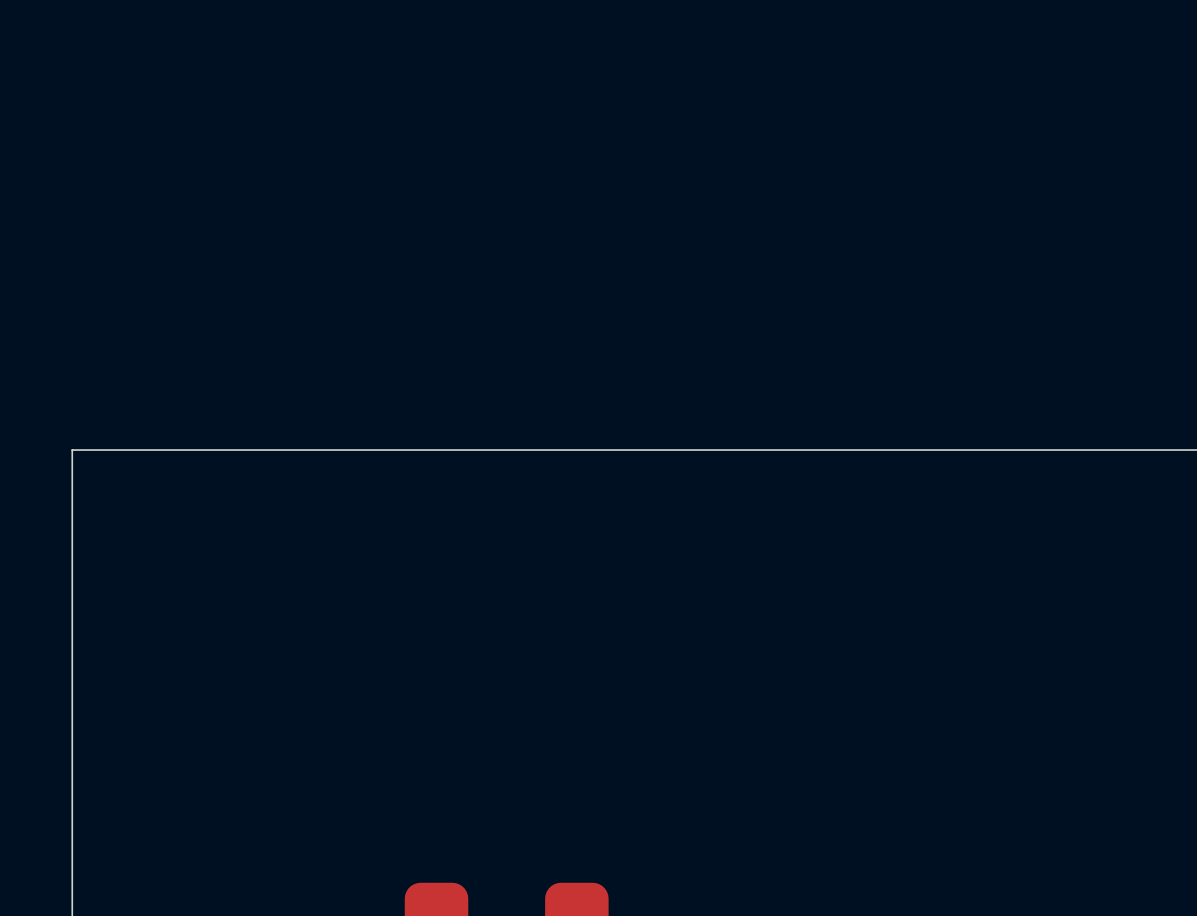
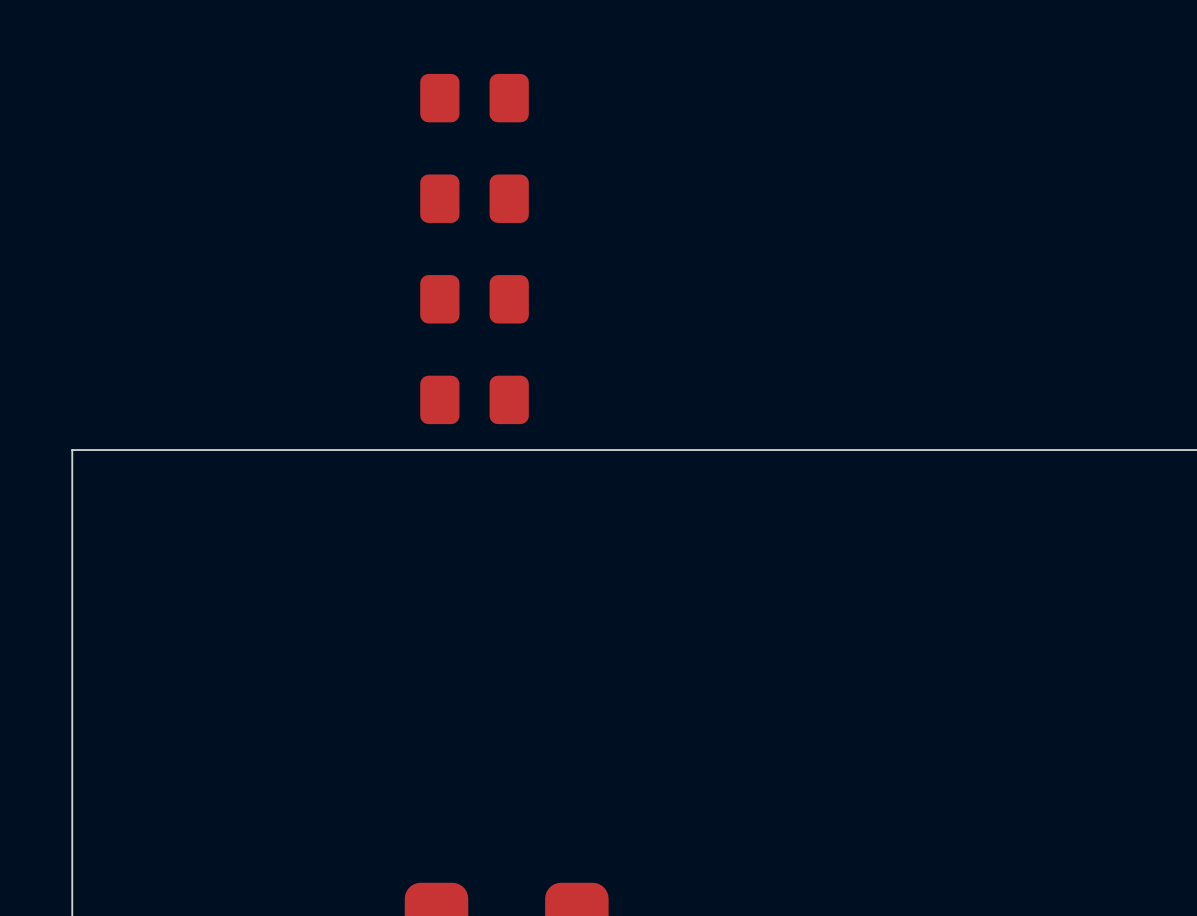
part: none -> (474, 98)
part: none -> (474, 198)
part: none -> (474, 299)
part: none -> (474, 399)

